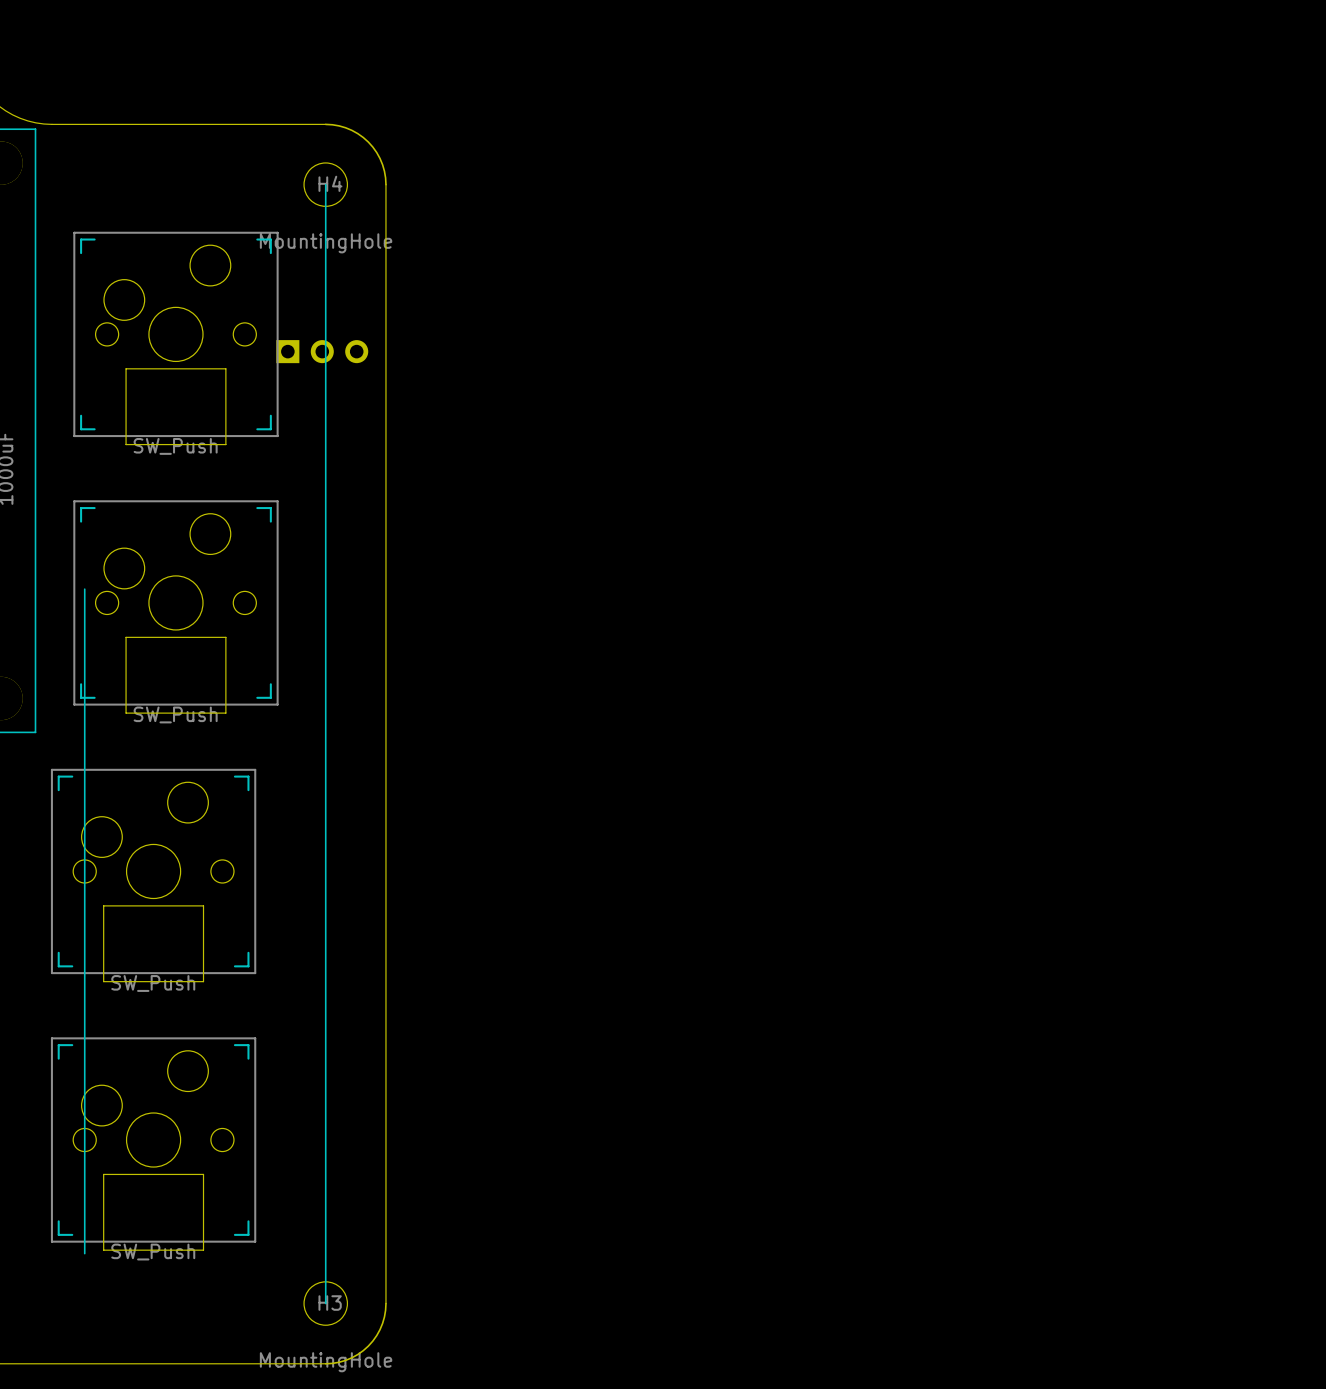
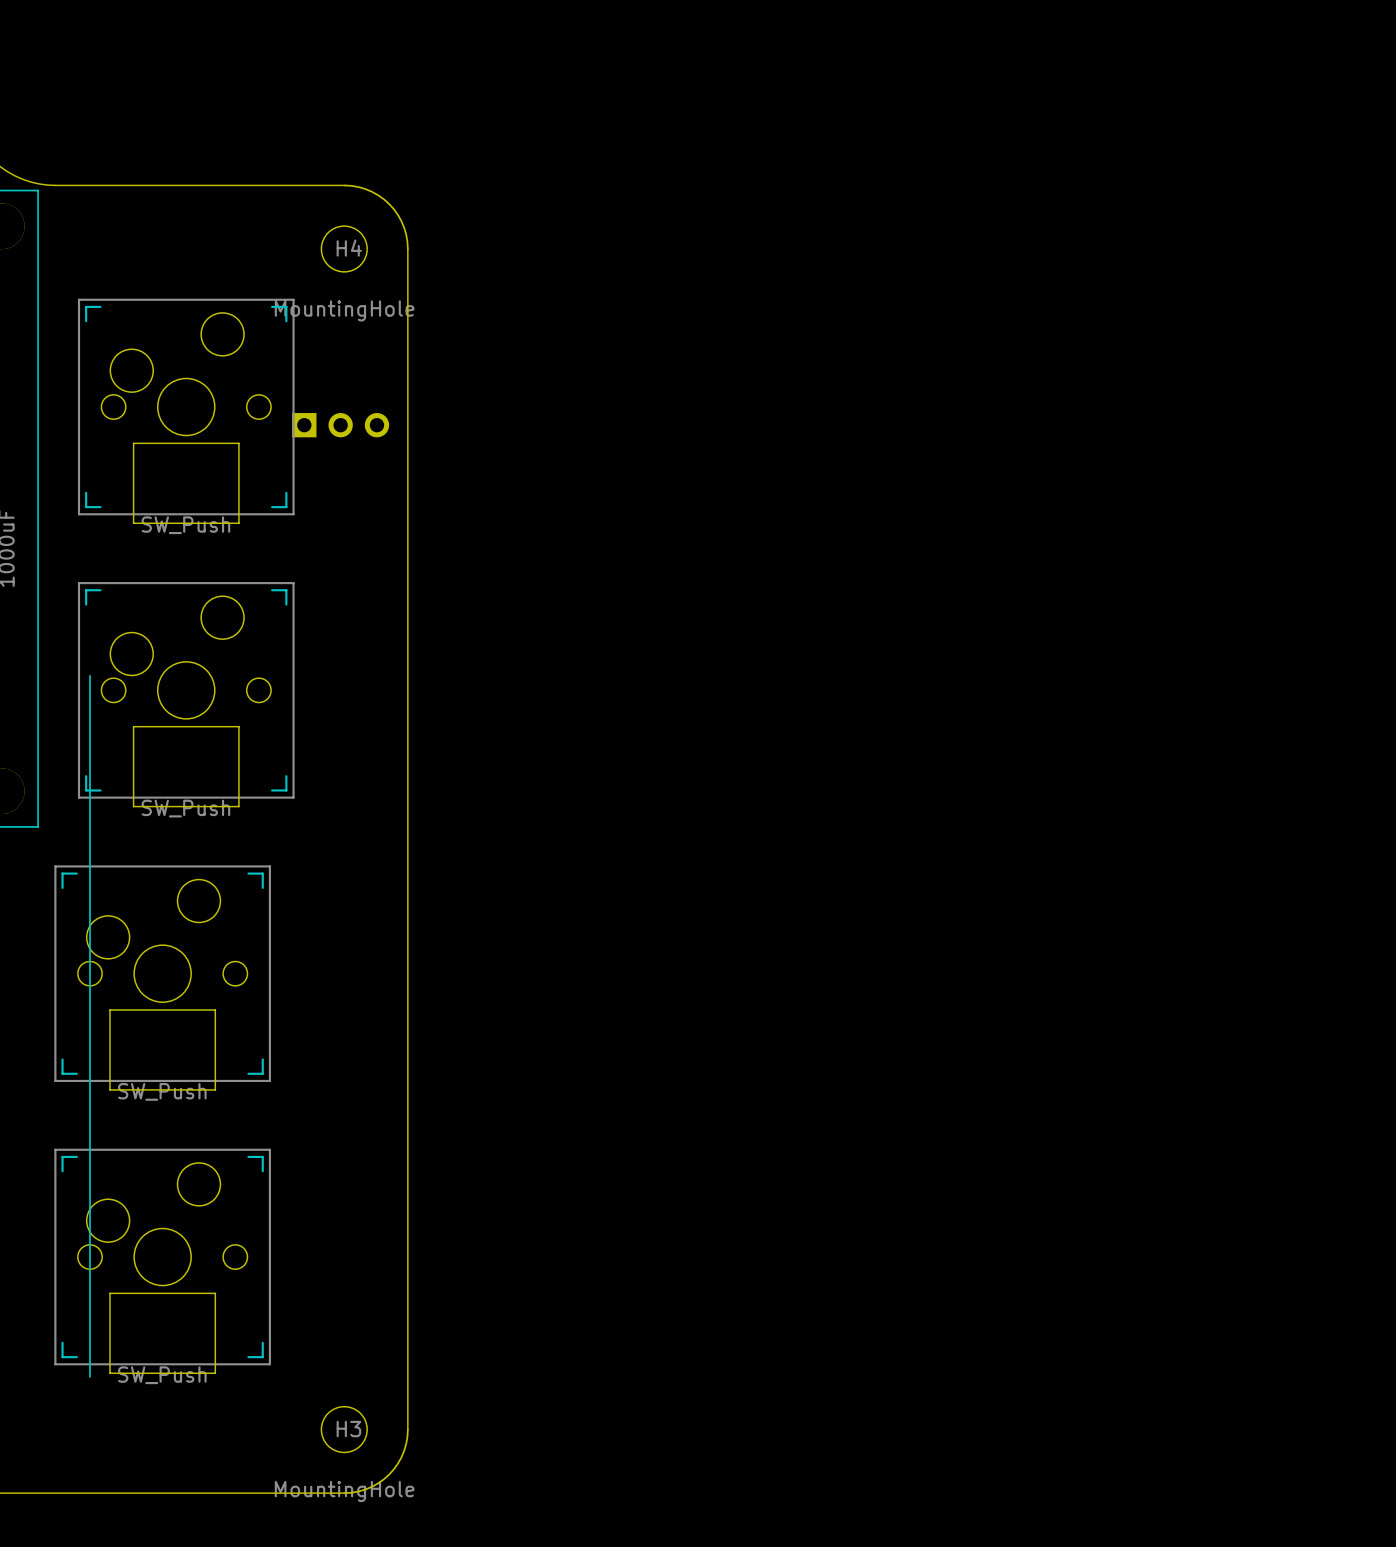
line: (325, 184) (325, 1303) -> none

